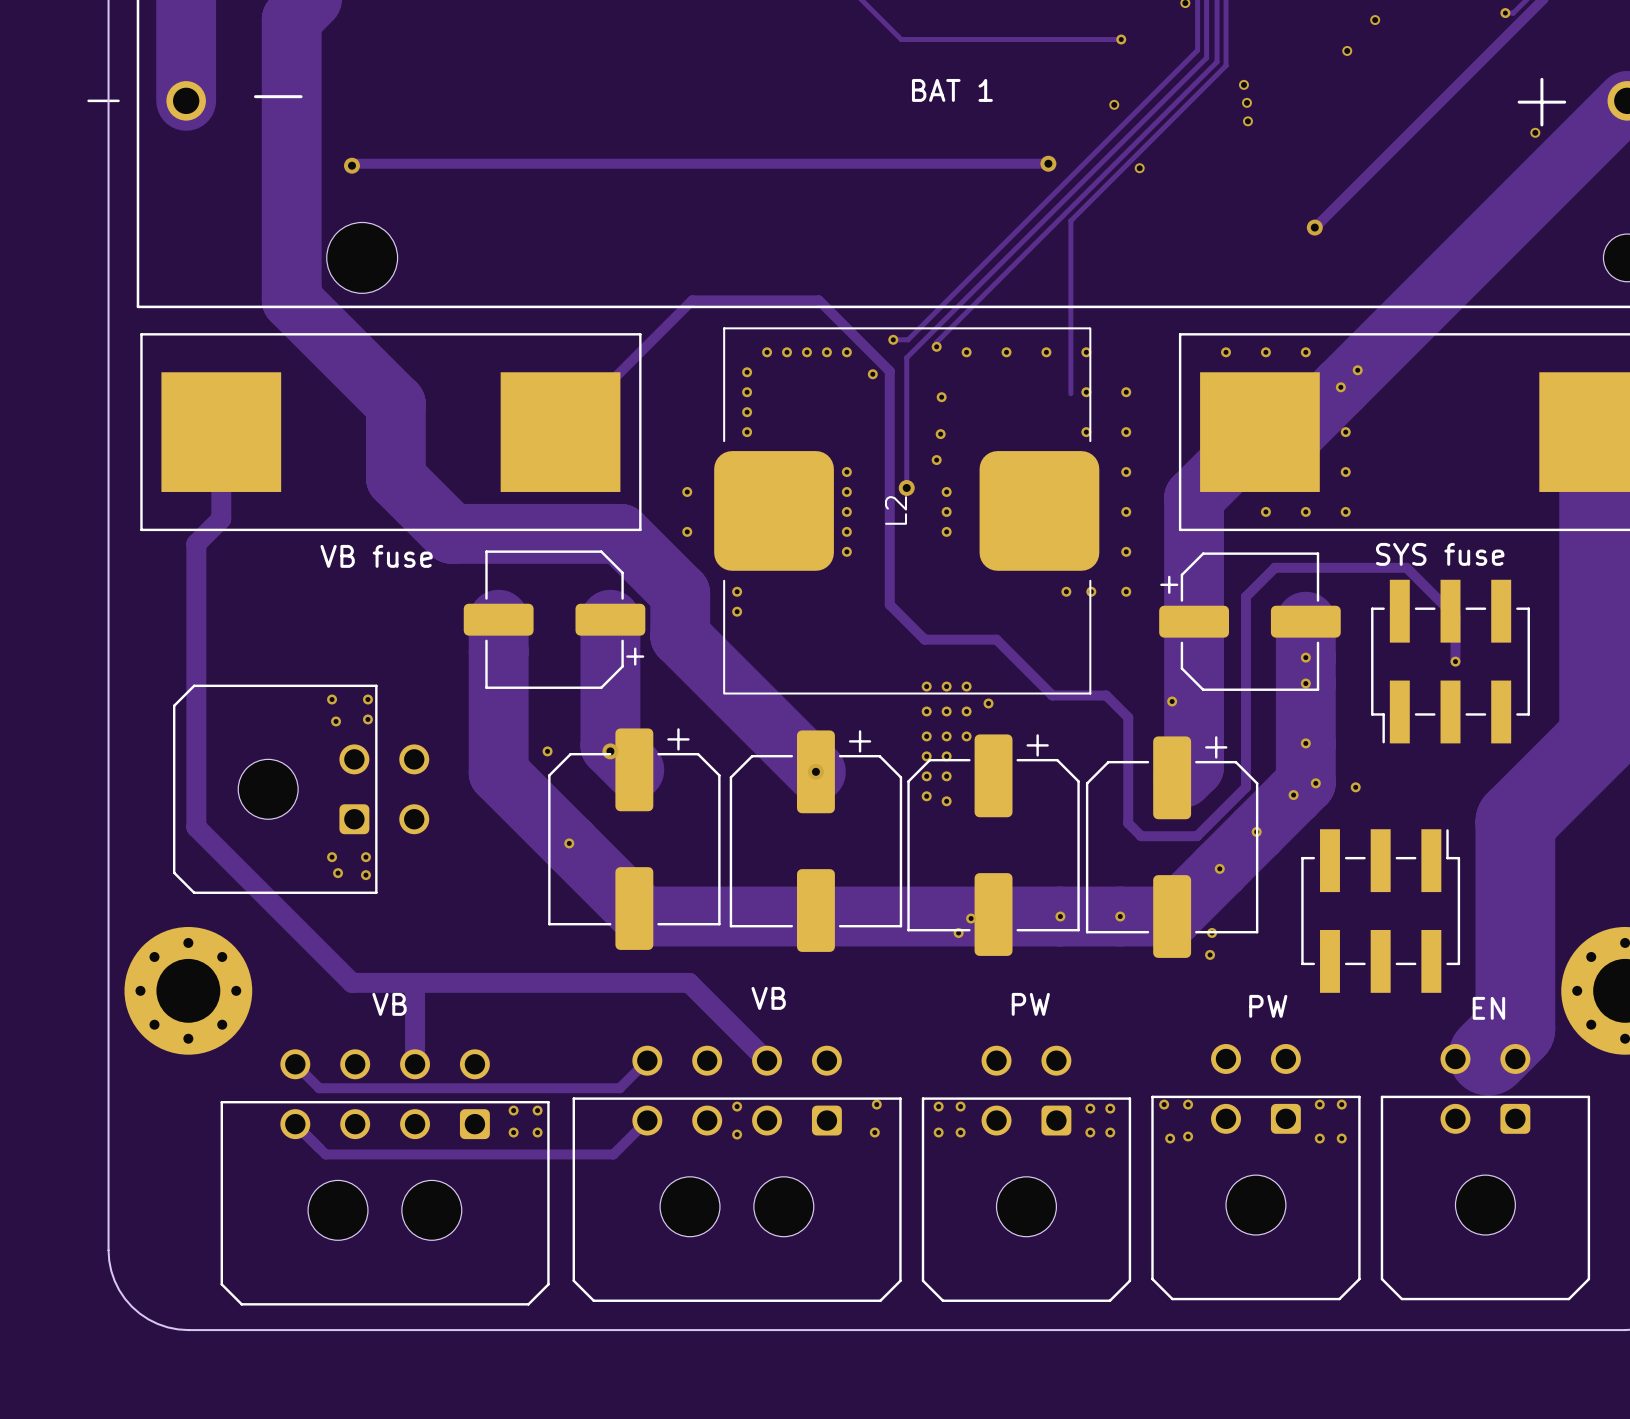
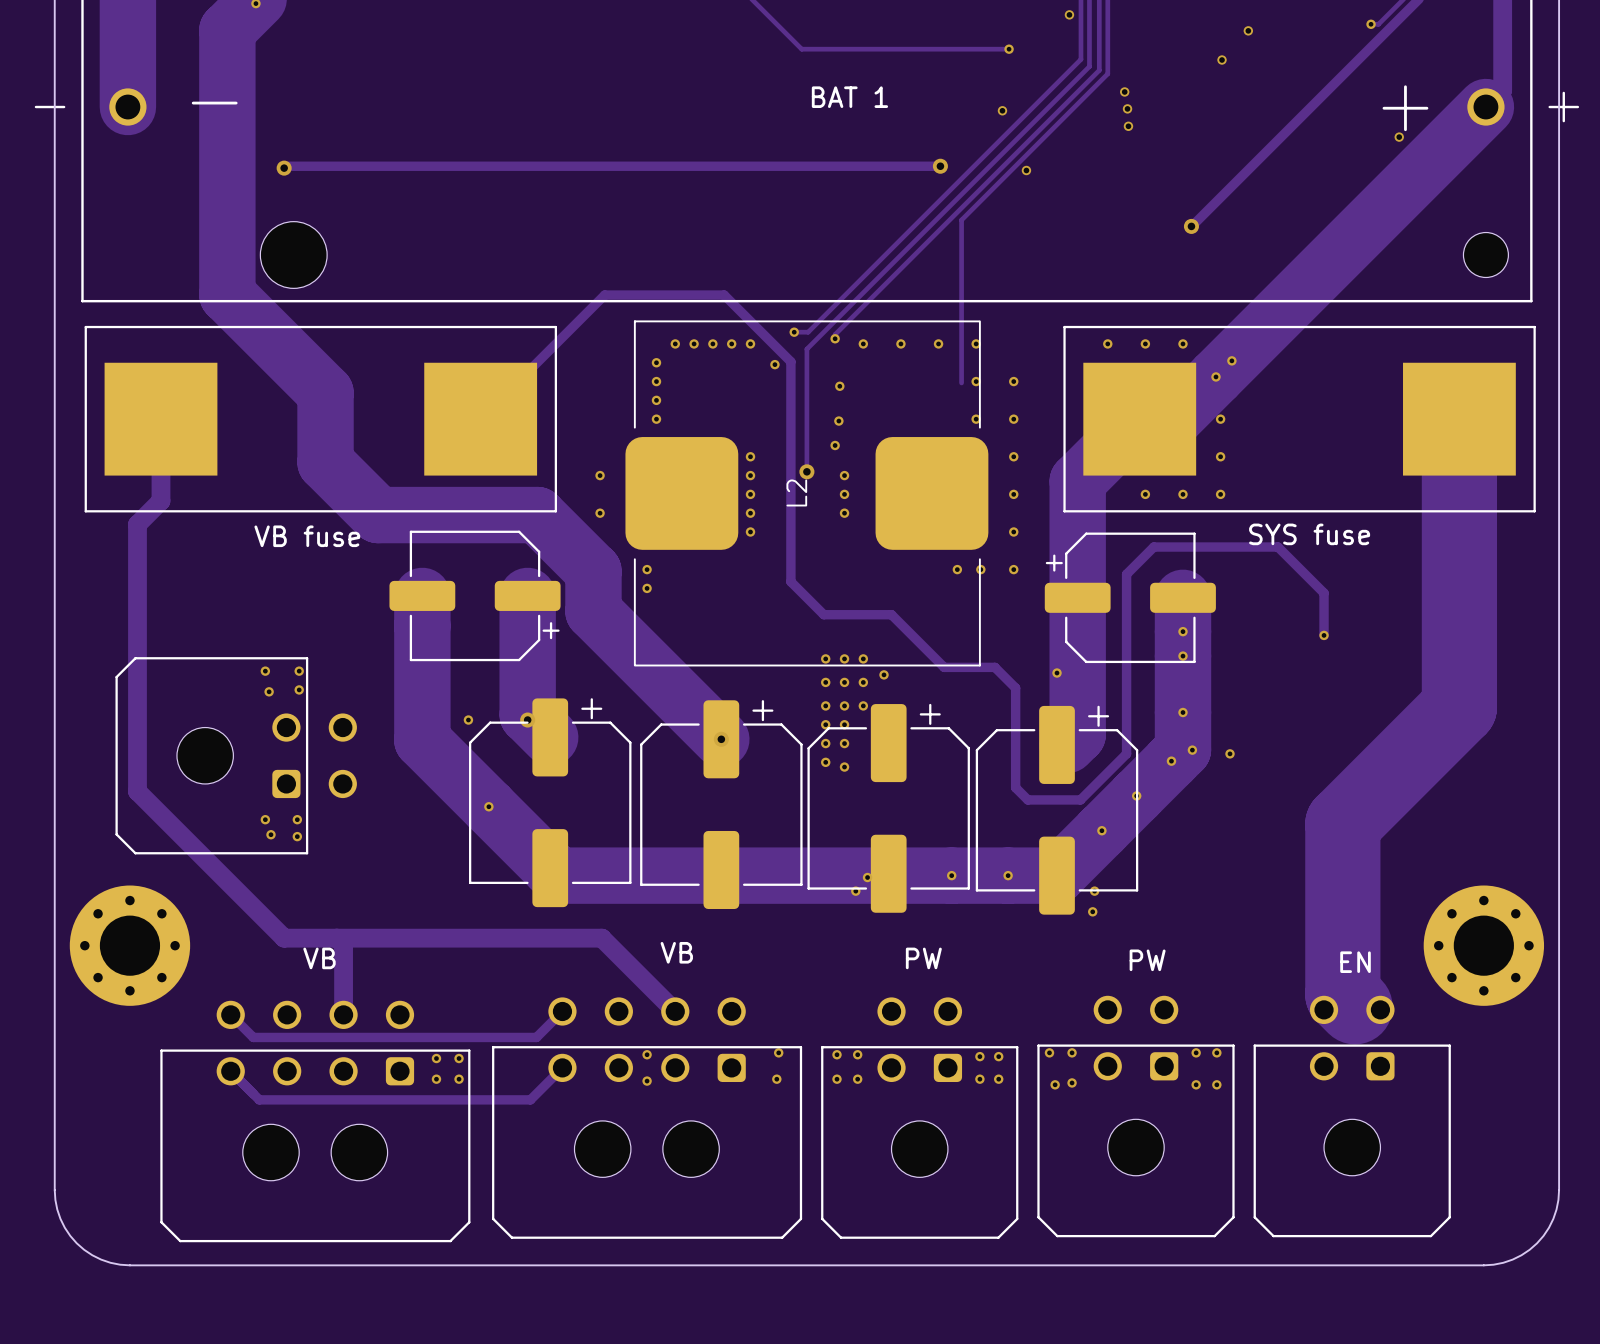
part: (1450, 661) -> none
track: (1515, 821) (1515, 1028) (1488, 1055) -> (1380, 786) (1342, 823) (1342, 994) (1355, 1006)
part: (1380, 911) -> none

